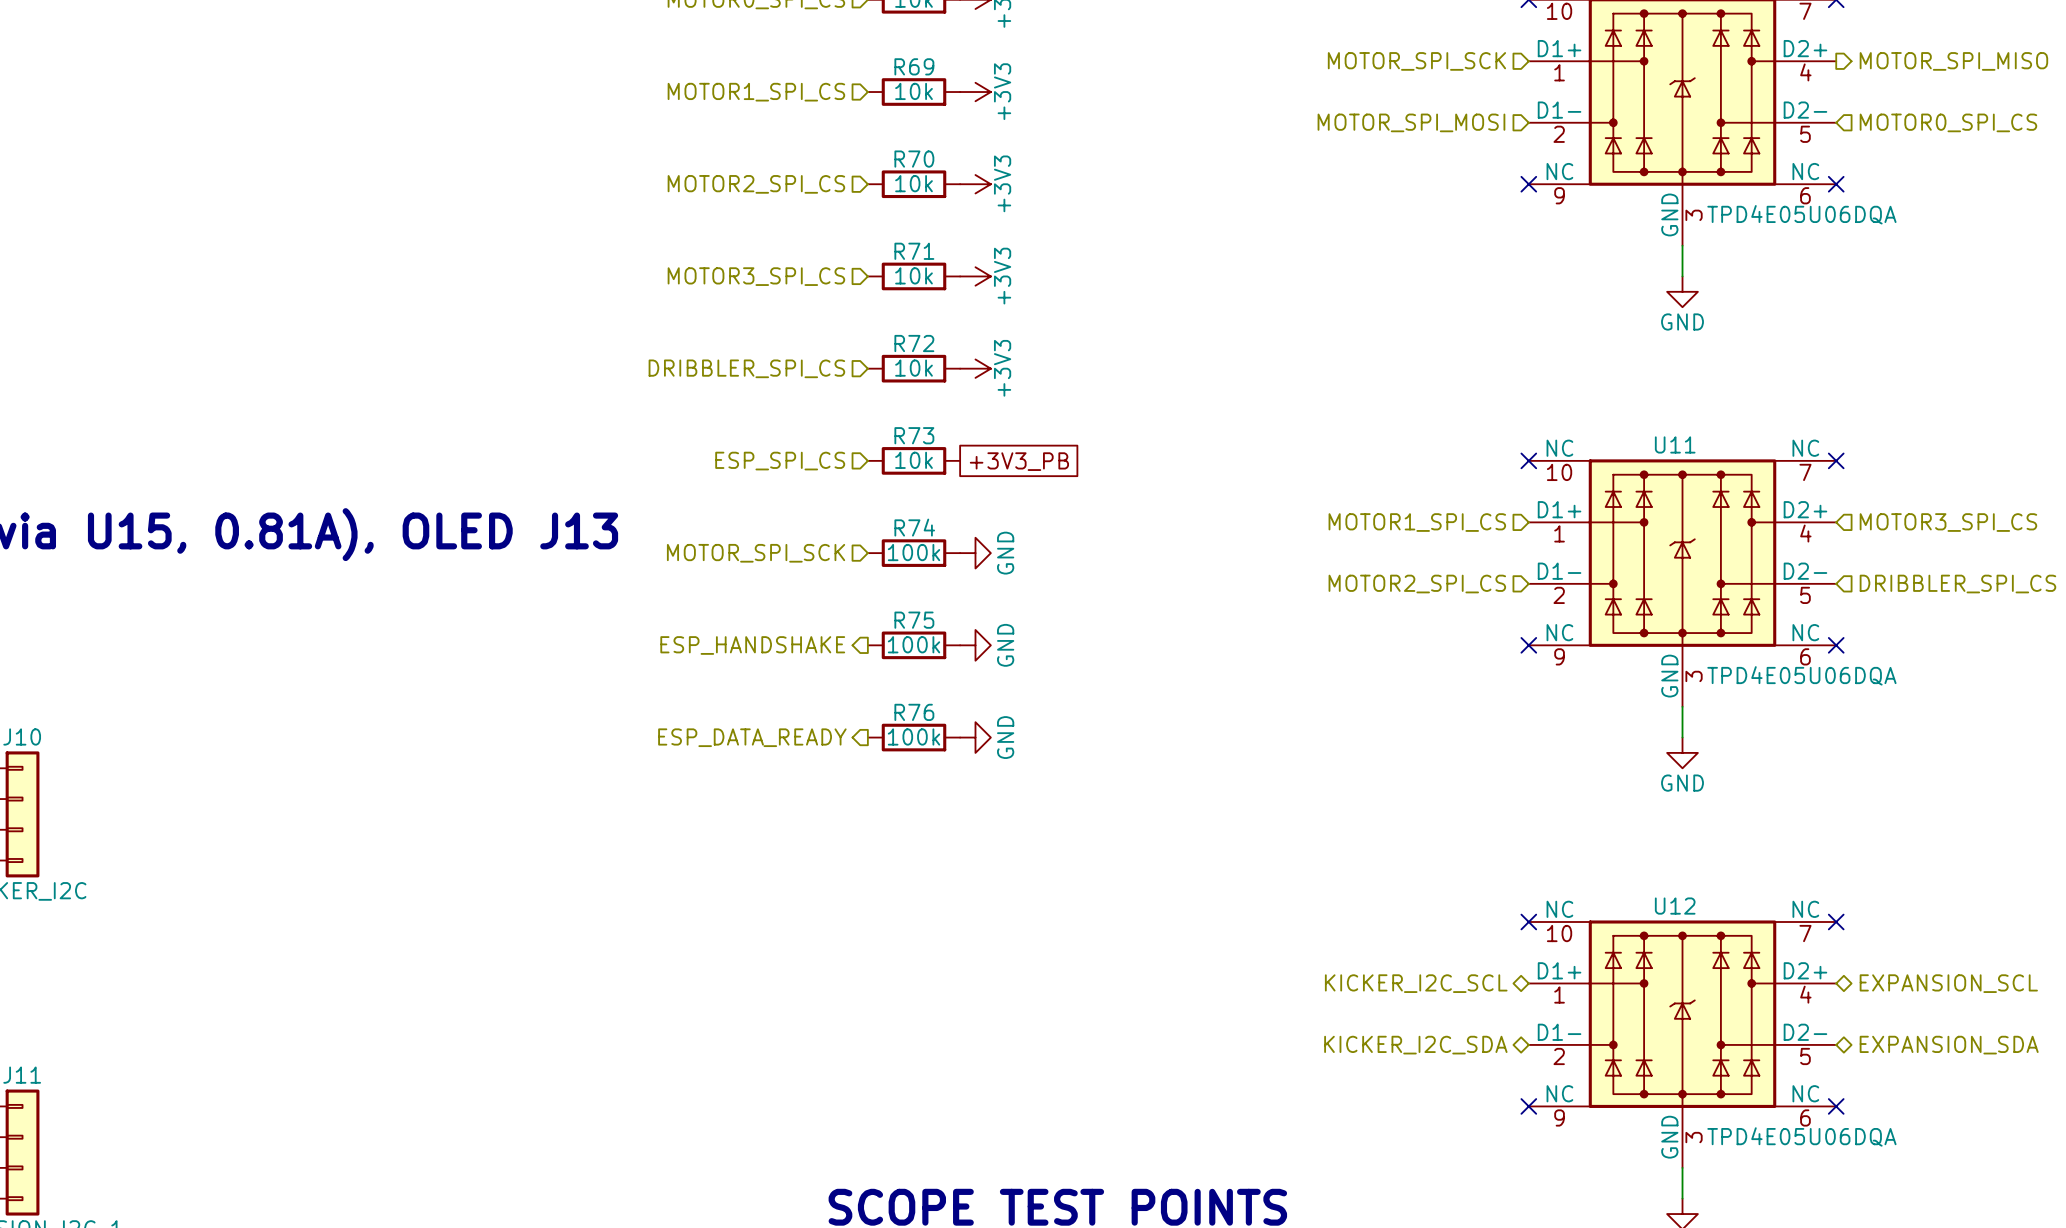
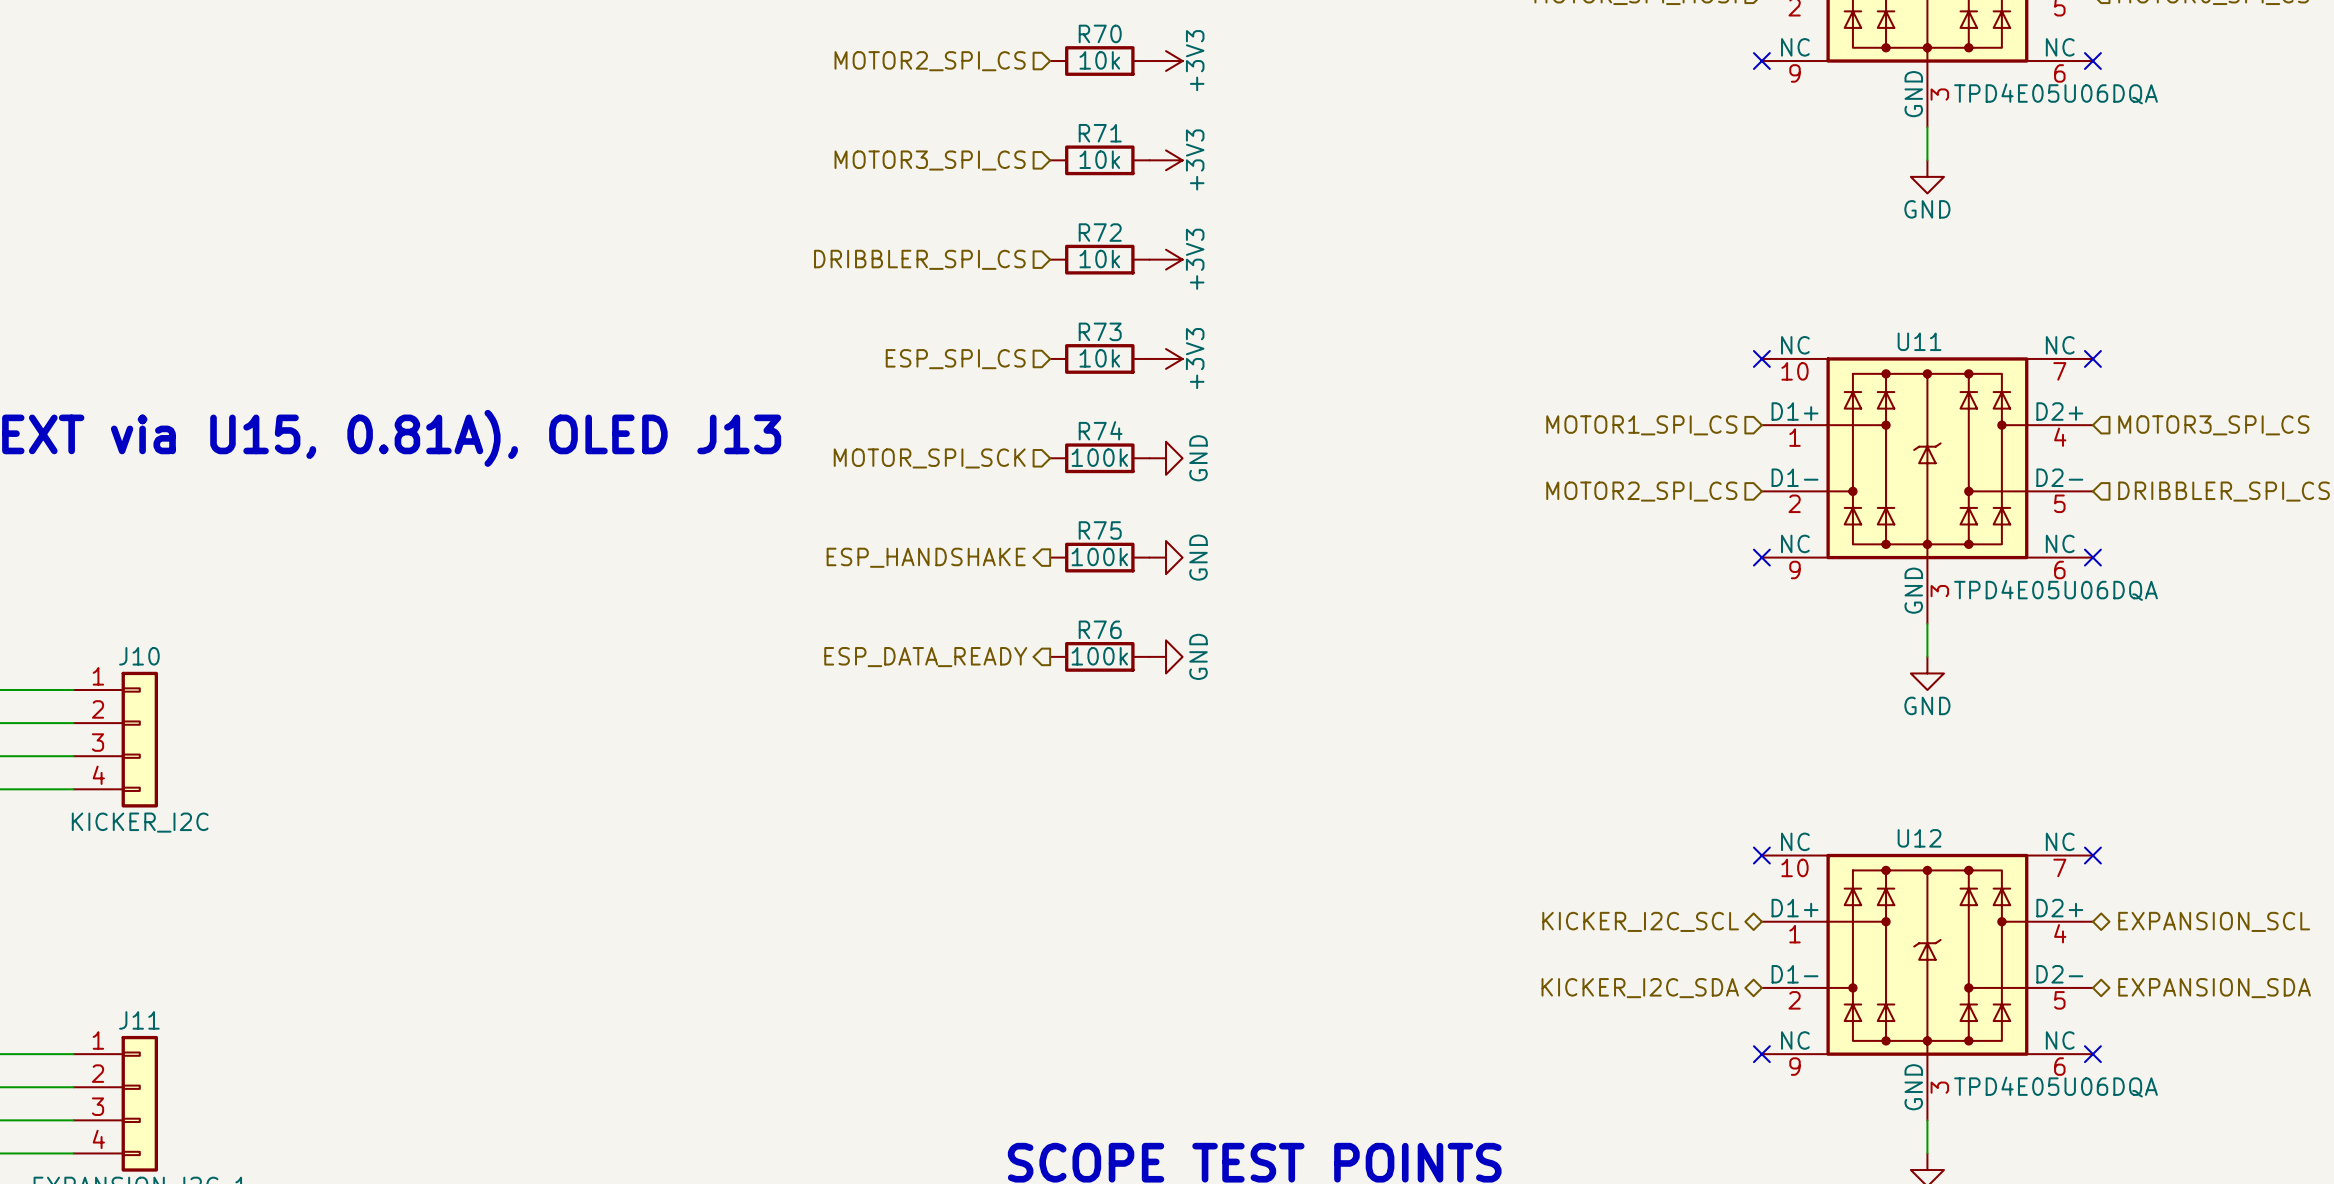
power symbol: none -> +3V3 (1166, 358)
global label: +3V3_PB (1019, 461) -> none

